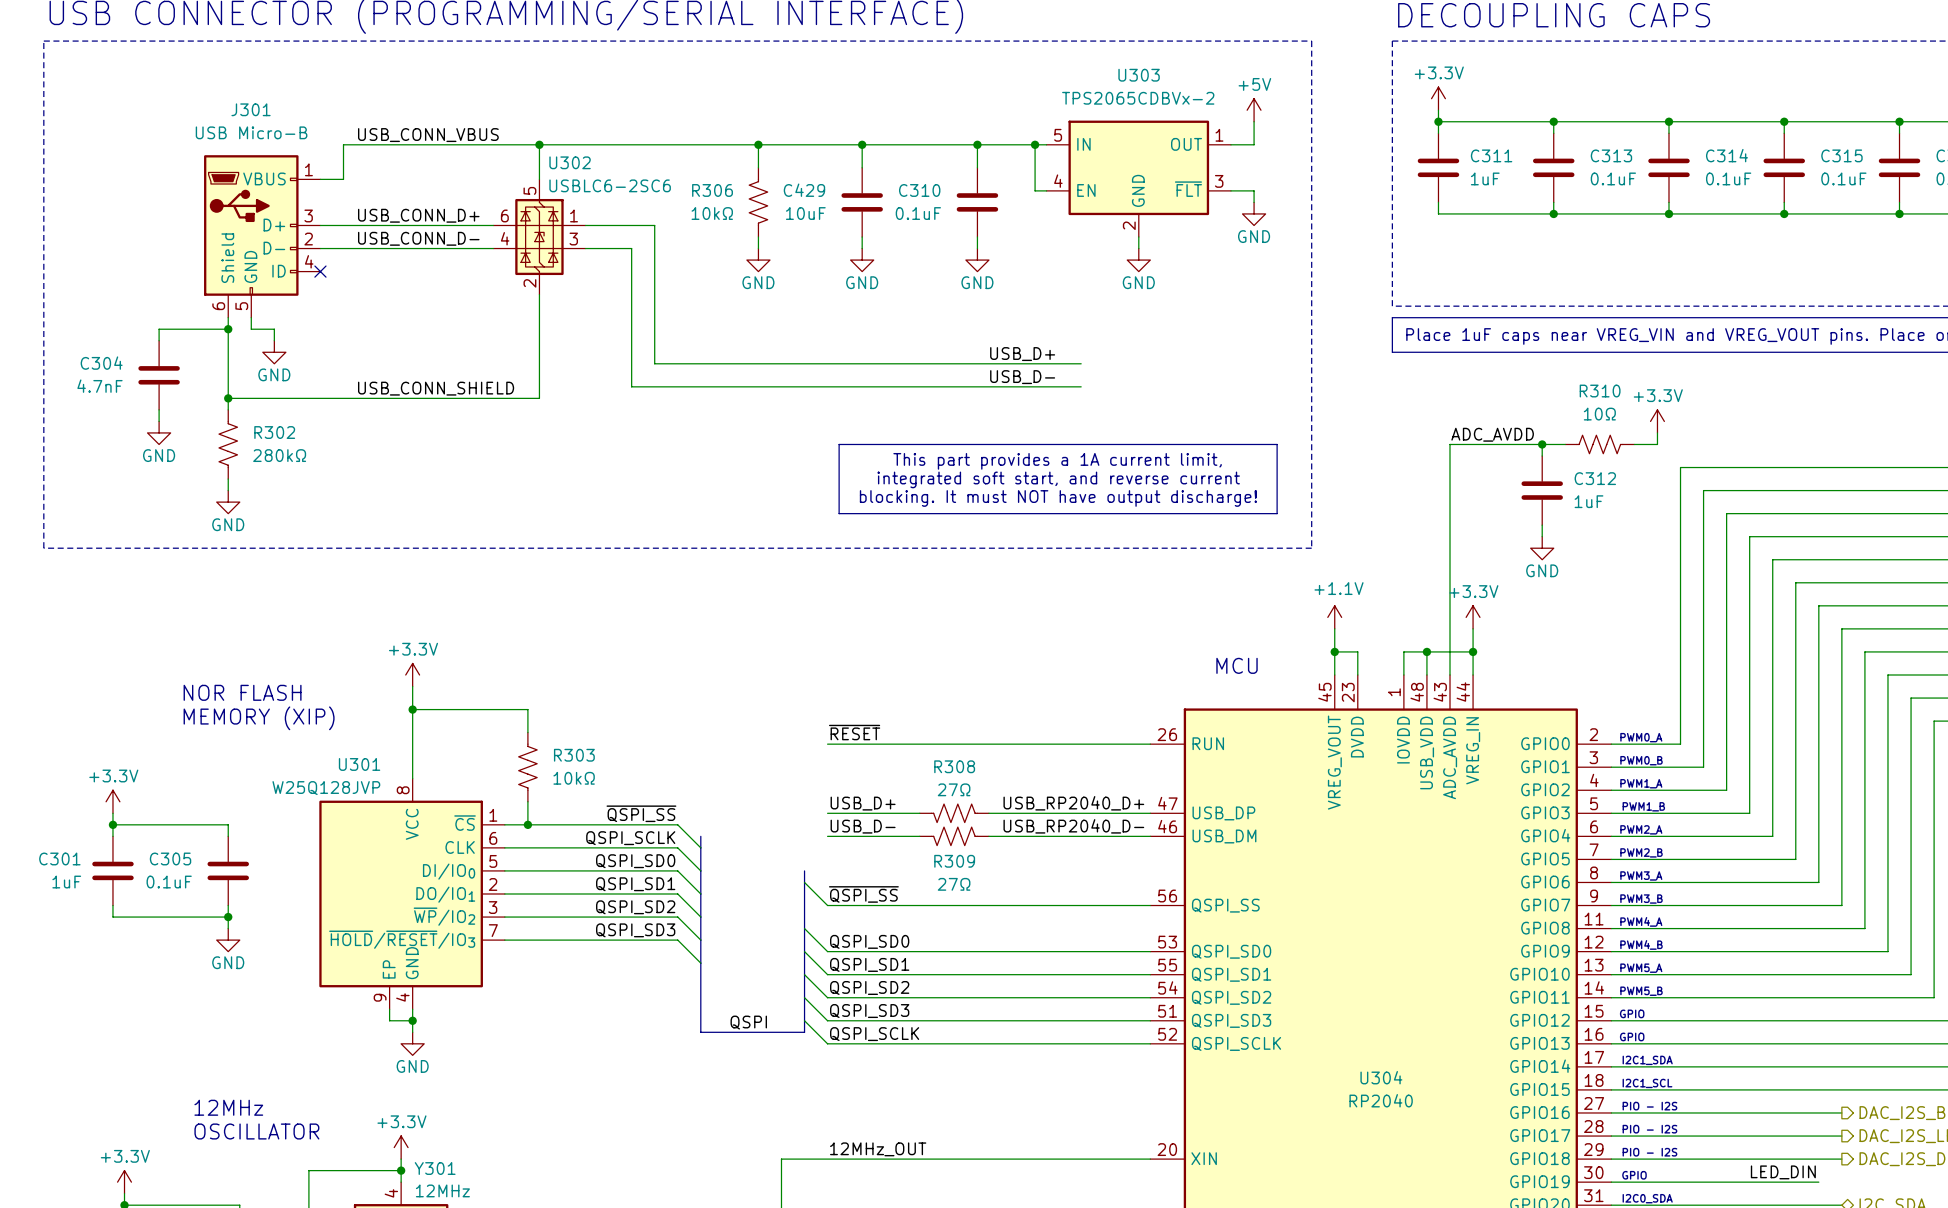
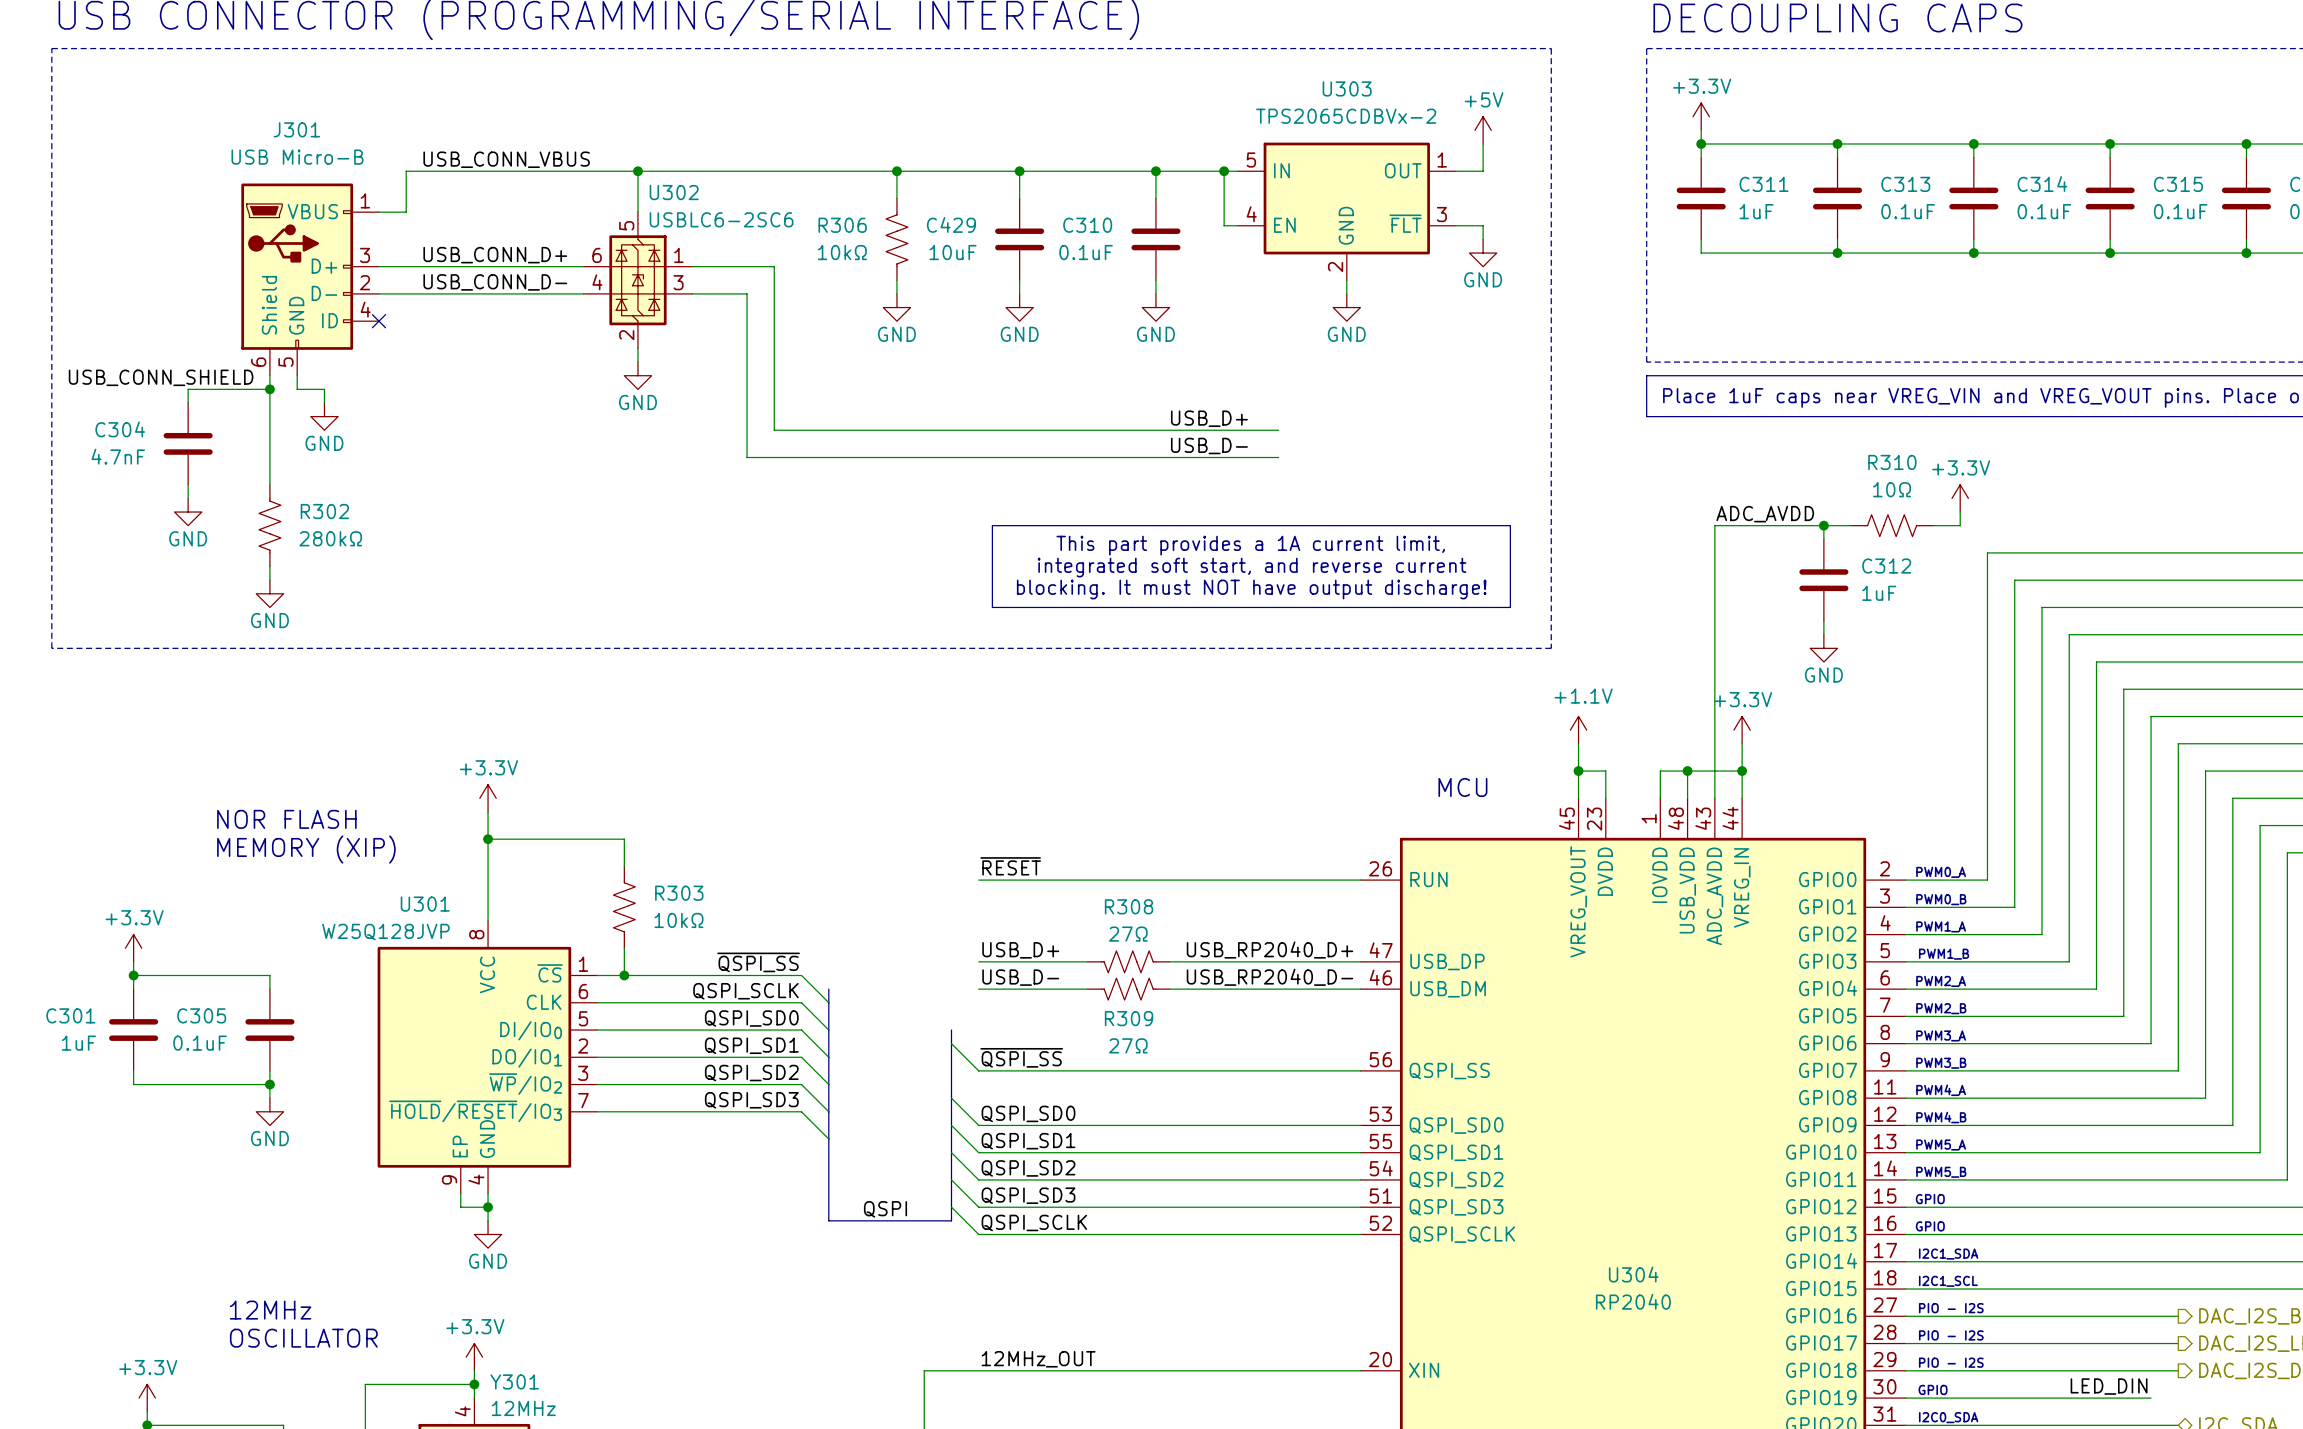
wire: (539, 306) (539, 398) (228, 398) -> none
power symbol: none -> GND (637, 375)
label position: USB_CONN_SHIELD (436, 388) -> USB_CONN_SHIELD (161, 377)
junction: (228, 398) -> none

